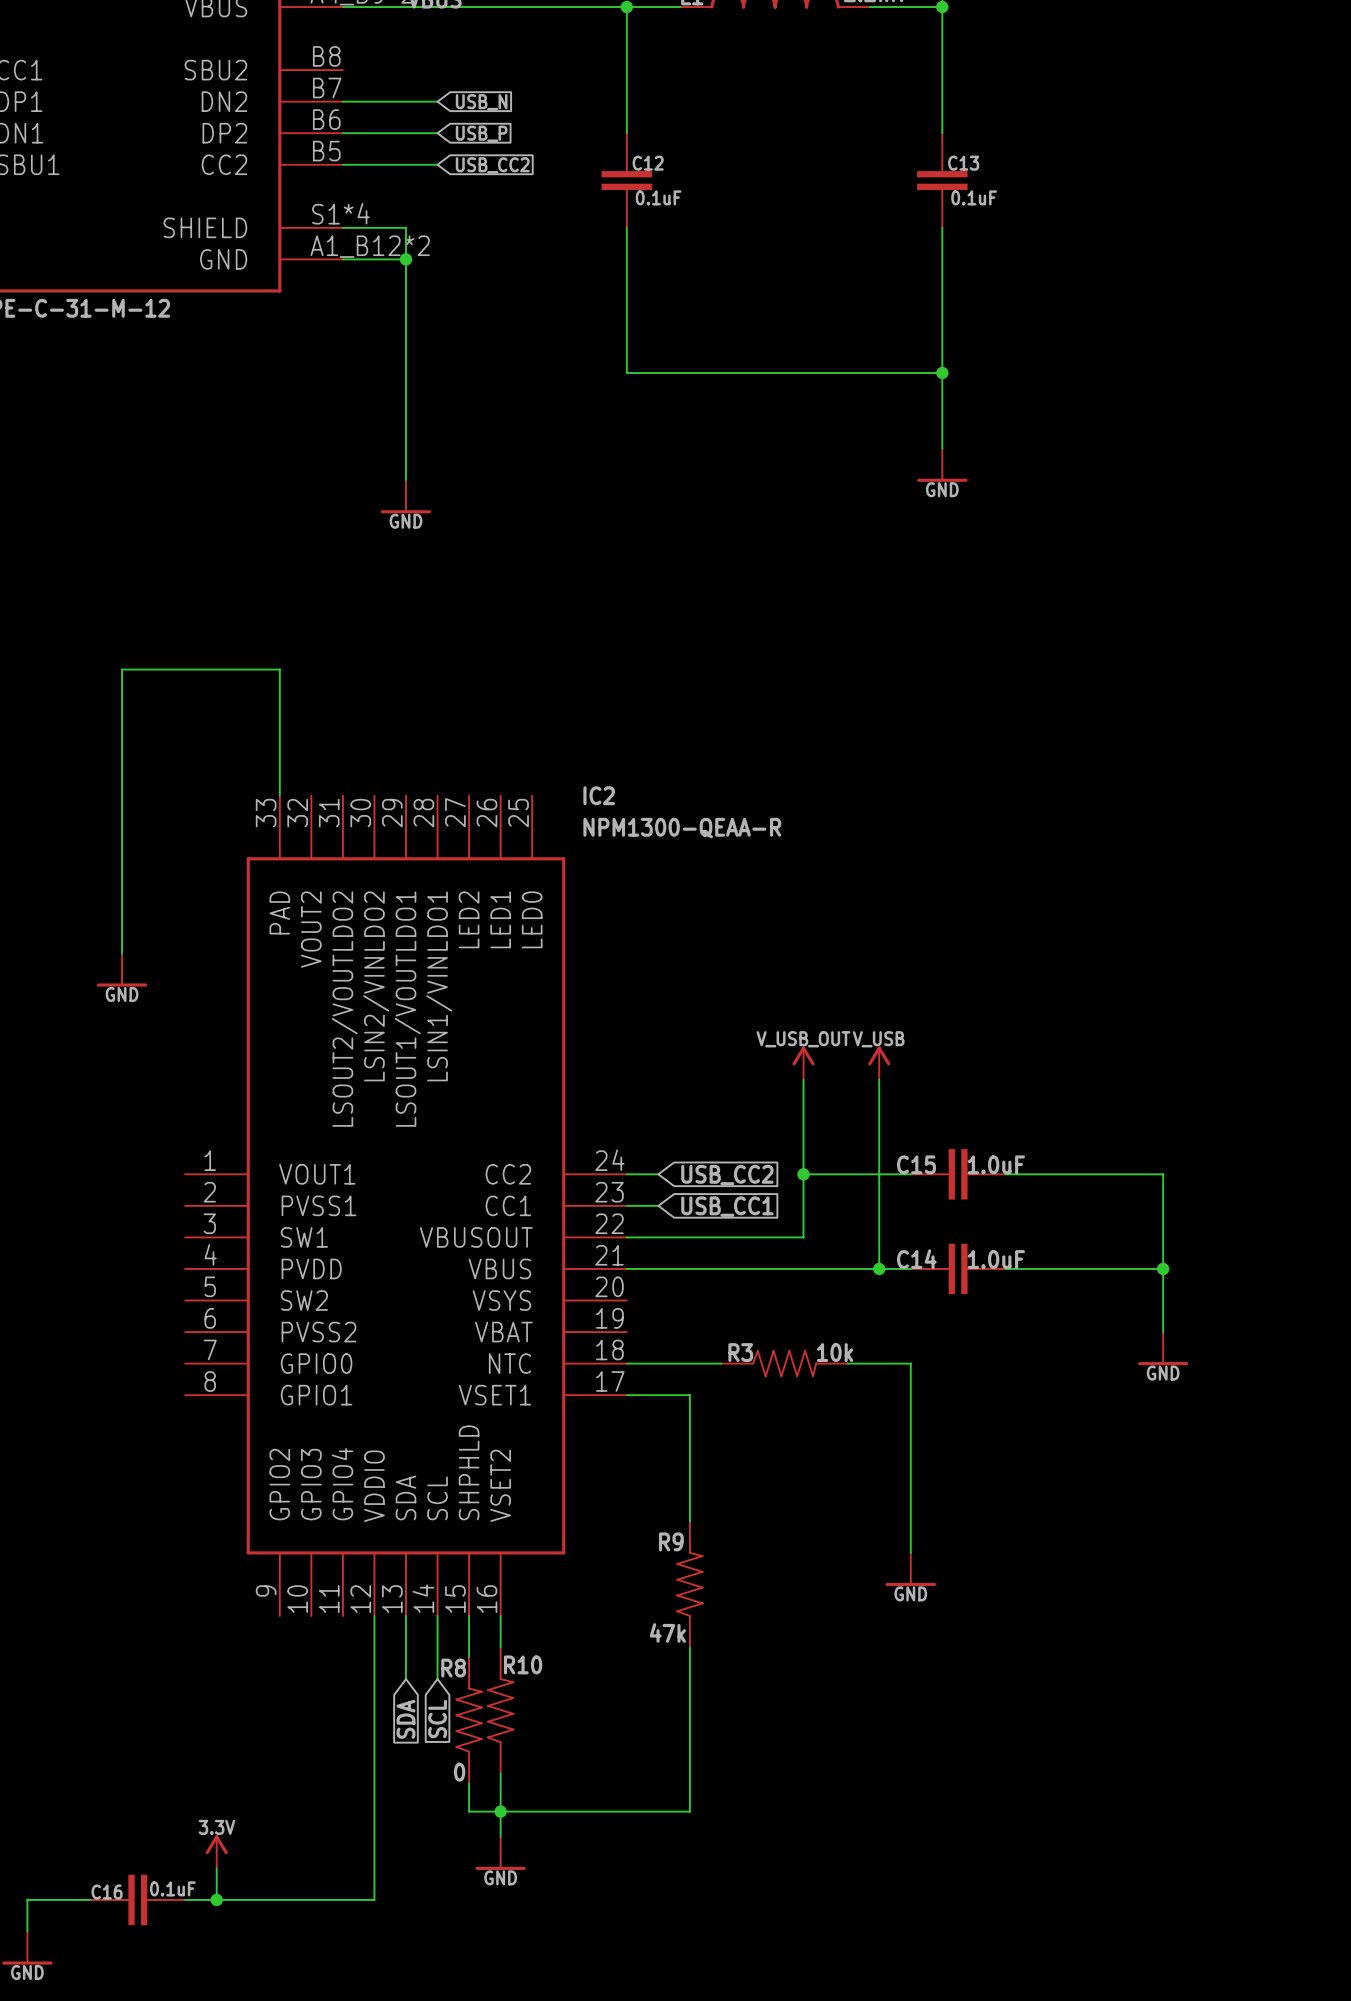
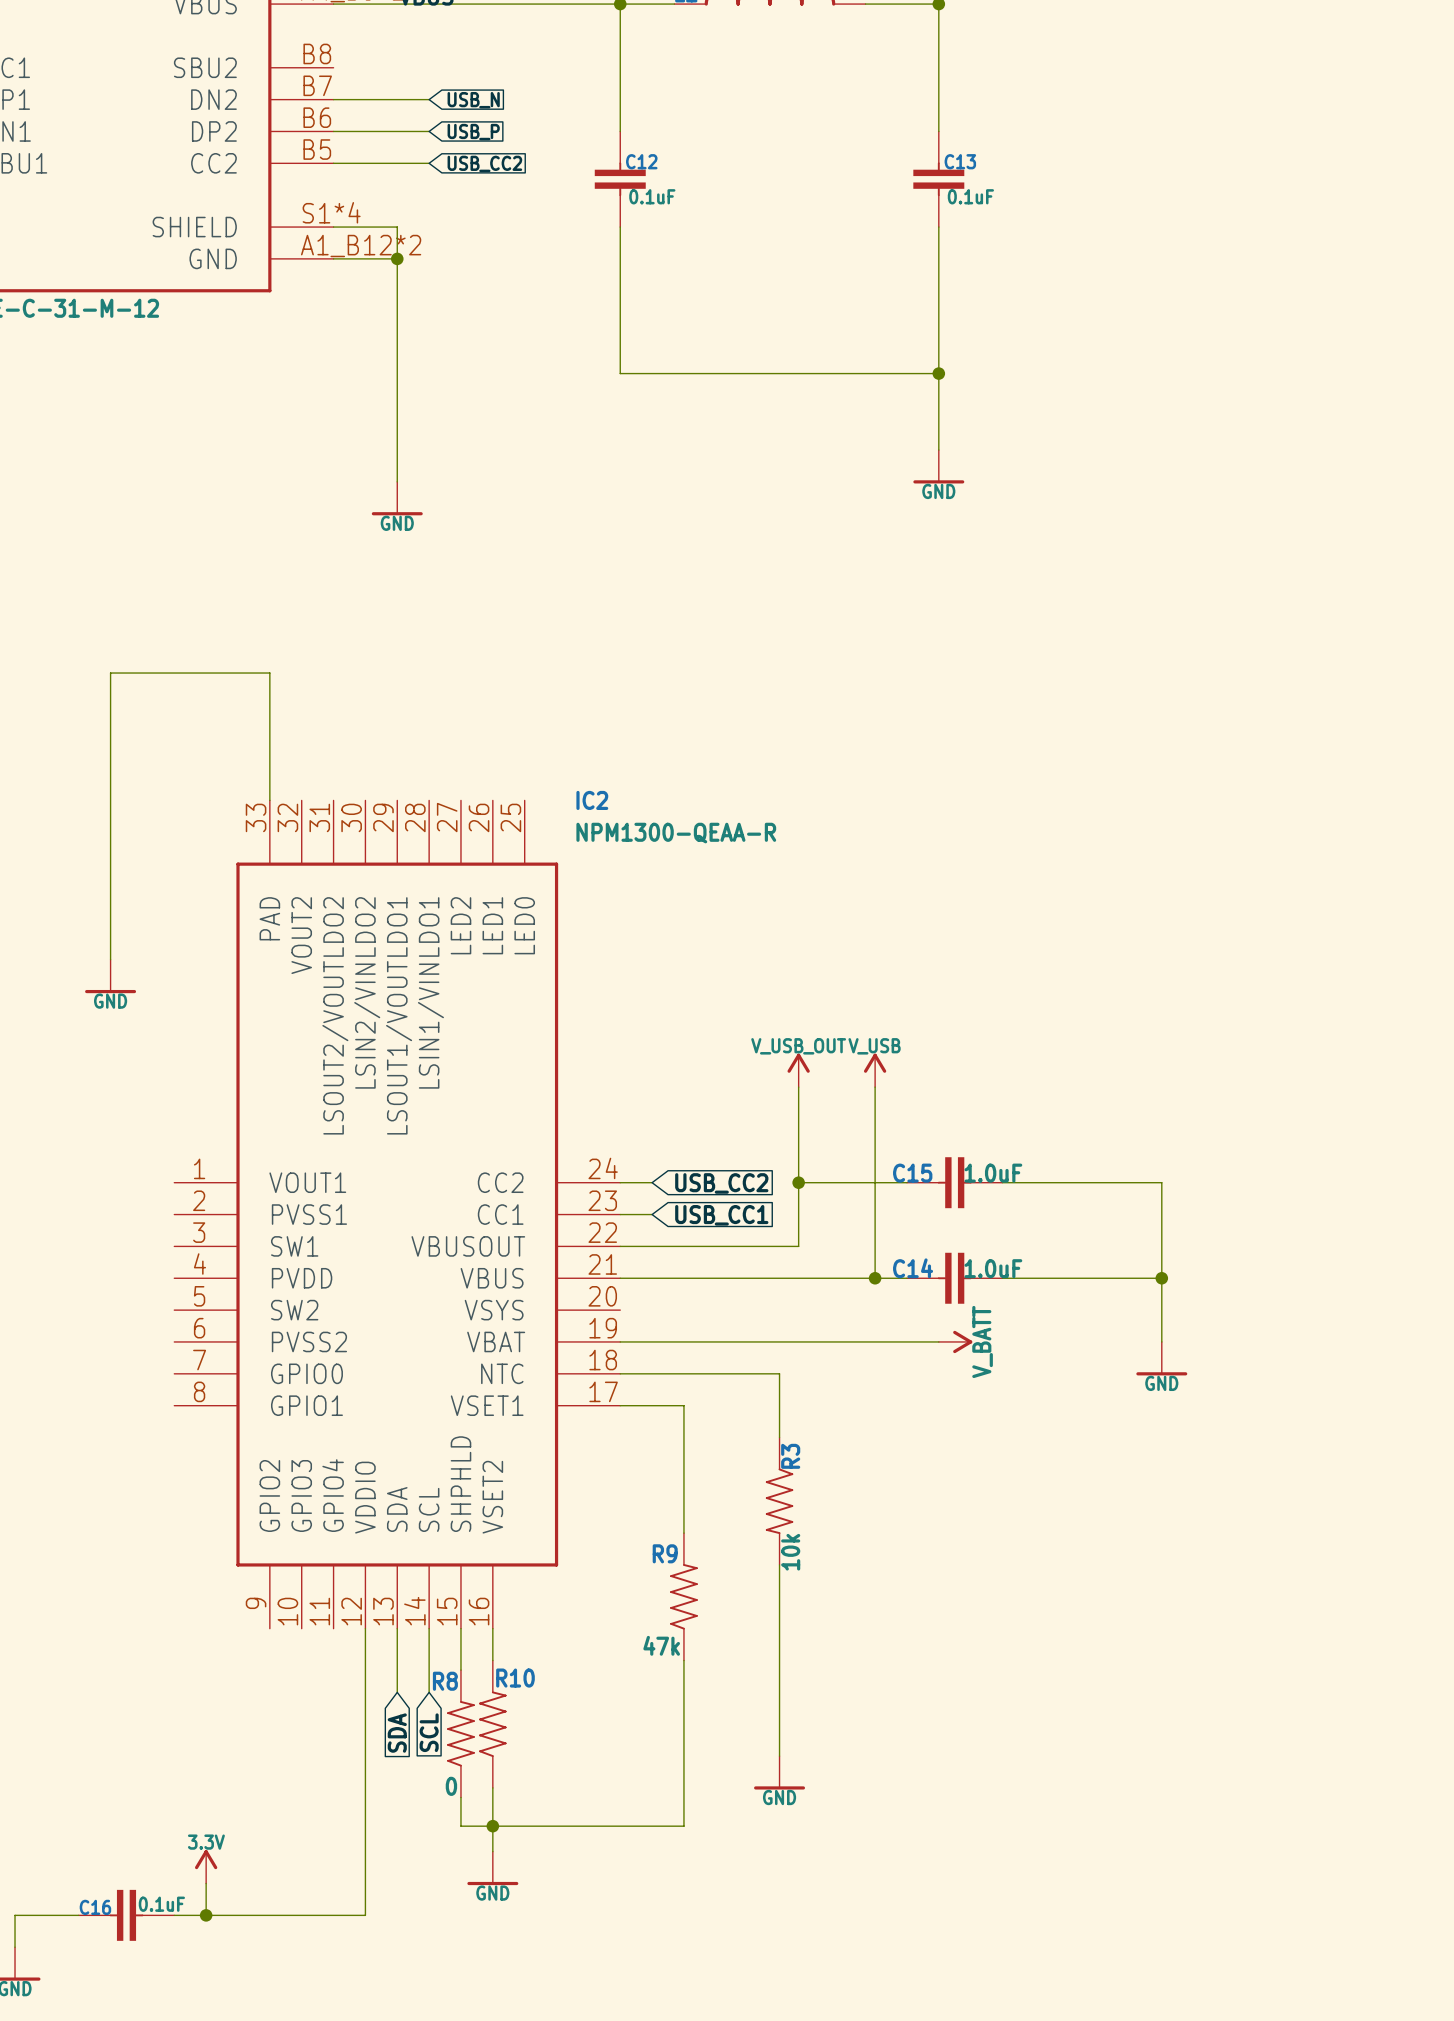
wire: none -> (620, 1341) (938, 1341)
power symbol: none -> V_BATT (955, 1341)
wire: none -> (715, 1373) (779, 1373) (779, 1437)
R3 rotation: 0° (784, 1363) -> 90° clockwise (779, 1501)
R3 position: (784, 1363) -> (779, 1501)
wire: (847, 1363) (910, 1363) (910, 1552) -> none
wire: none -> (779, 1564) (779, 1756)
power symbol position: GND (910, 1569) -> GND (779, 1772)

